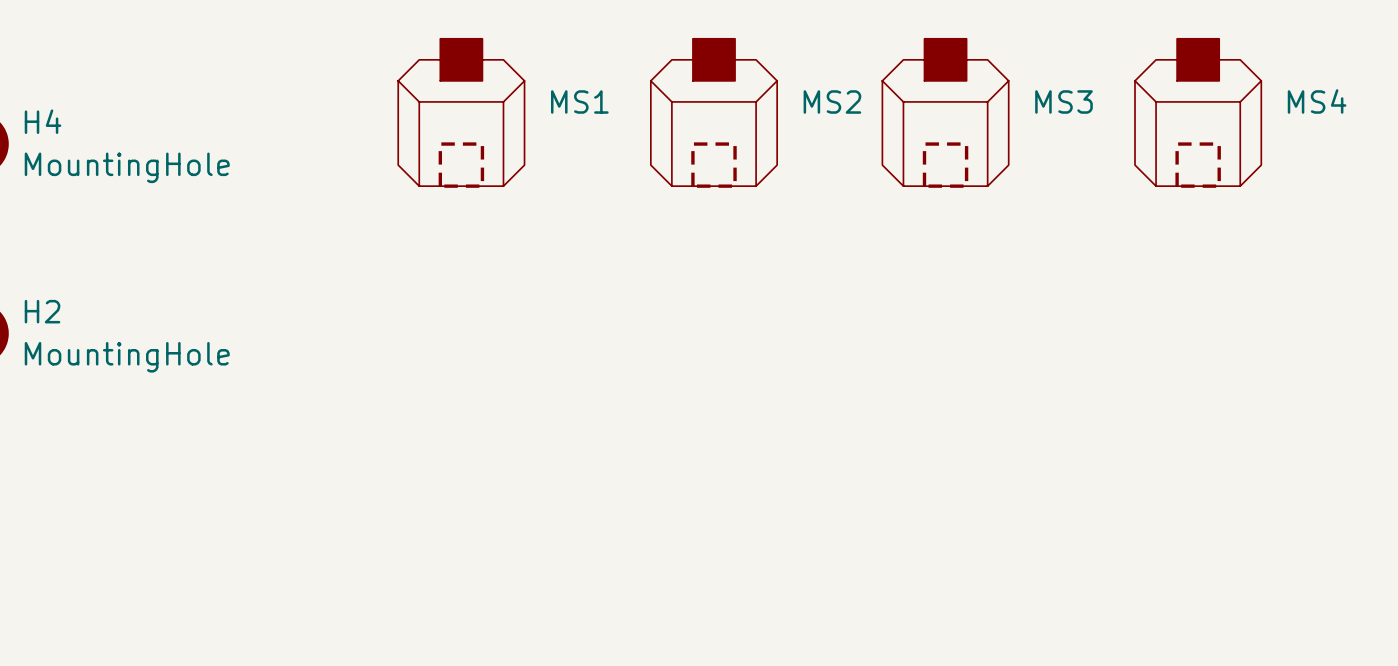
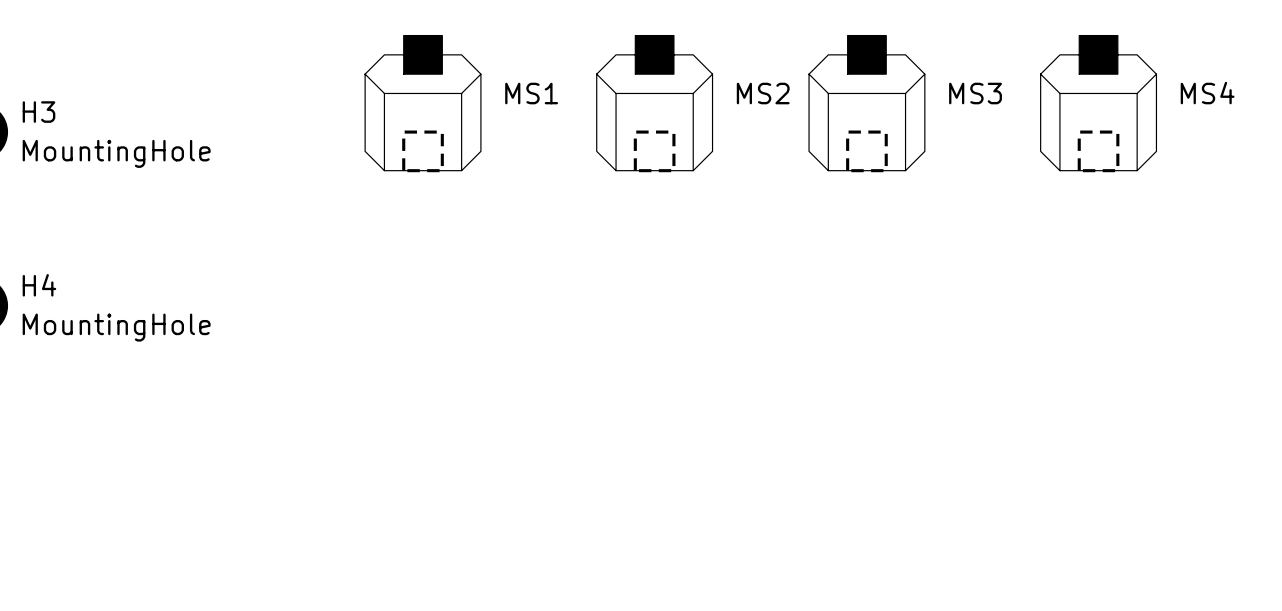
H4 name: H4 (43, 121) -> H3 (38, 112)
H2 name: H2 (42, 311) -> H4 (39, 285)

